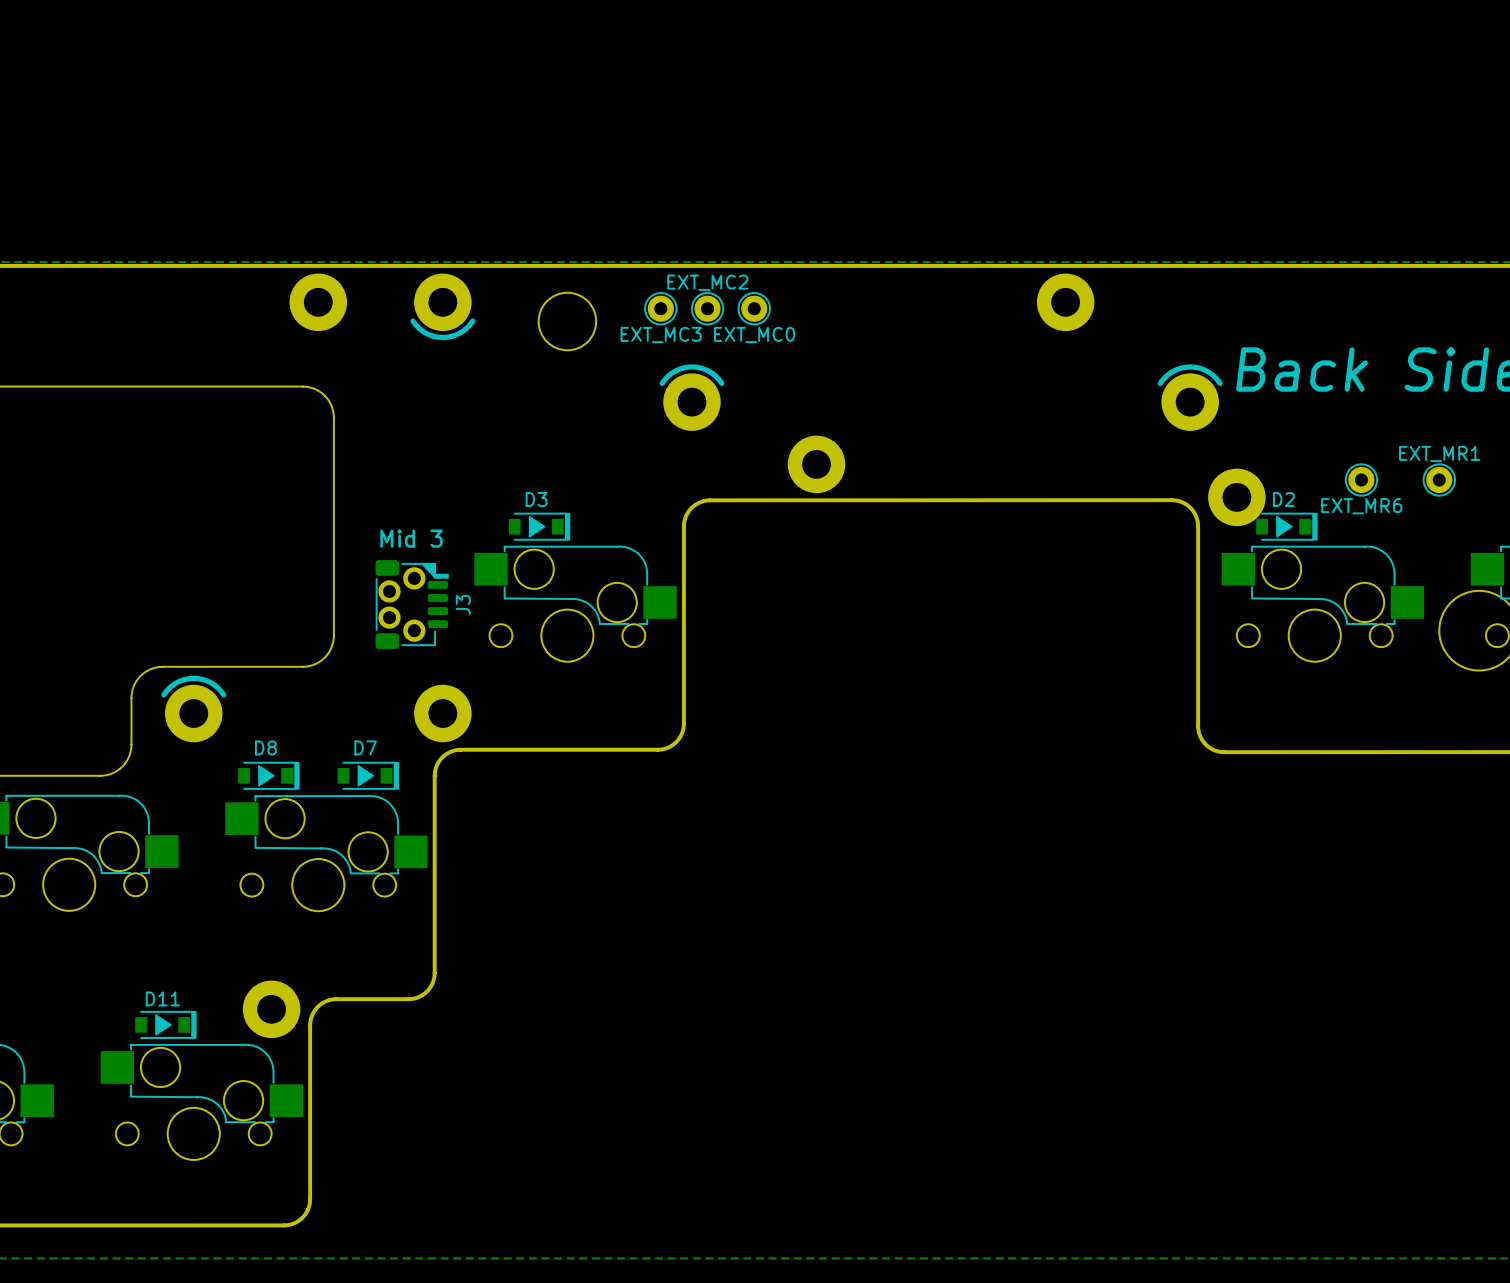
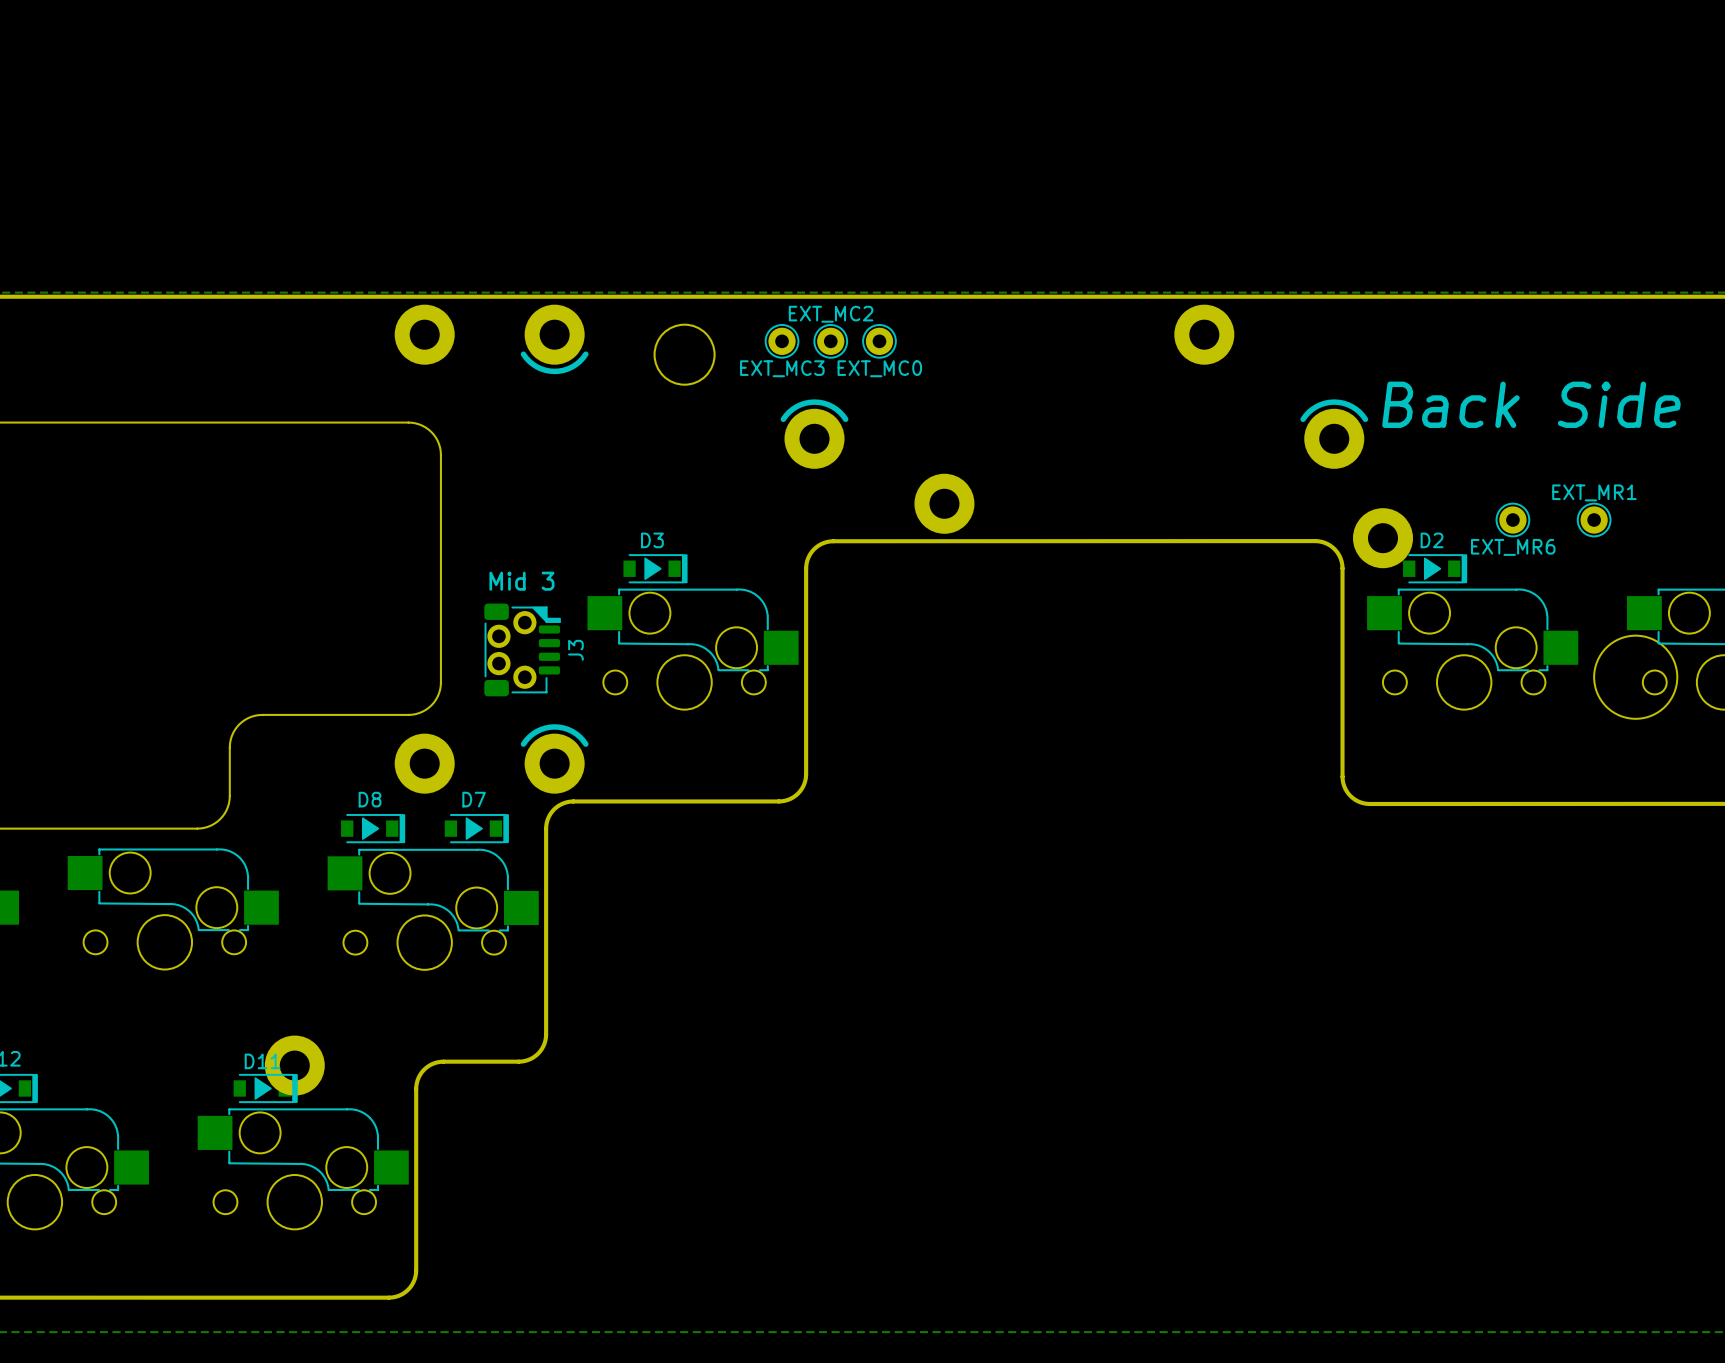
part: (193, 708) -> none
part: none -> (424, 763)
part side: top (442, 713) -> bottom (554, 758)
part position: (271, 1009) -> (294, 1065)

